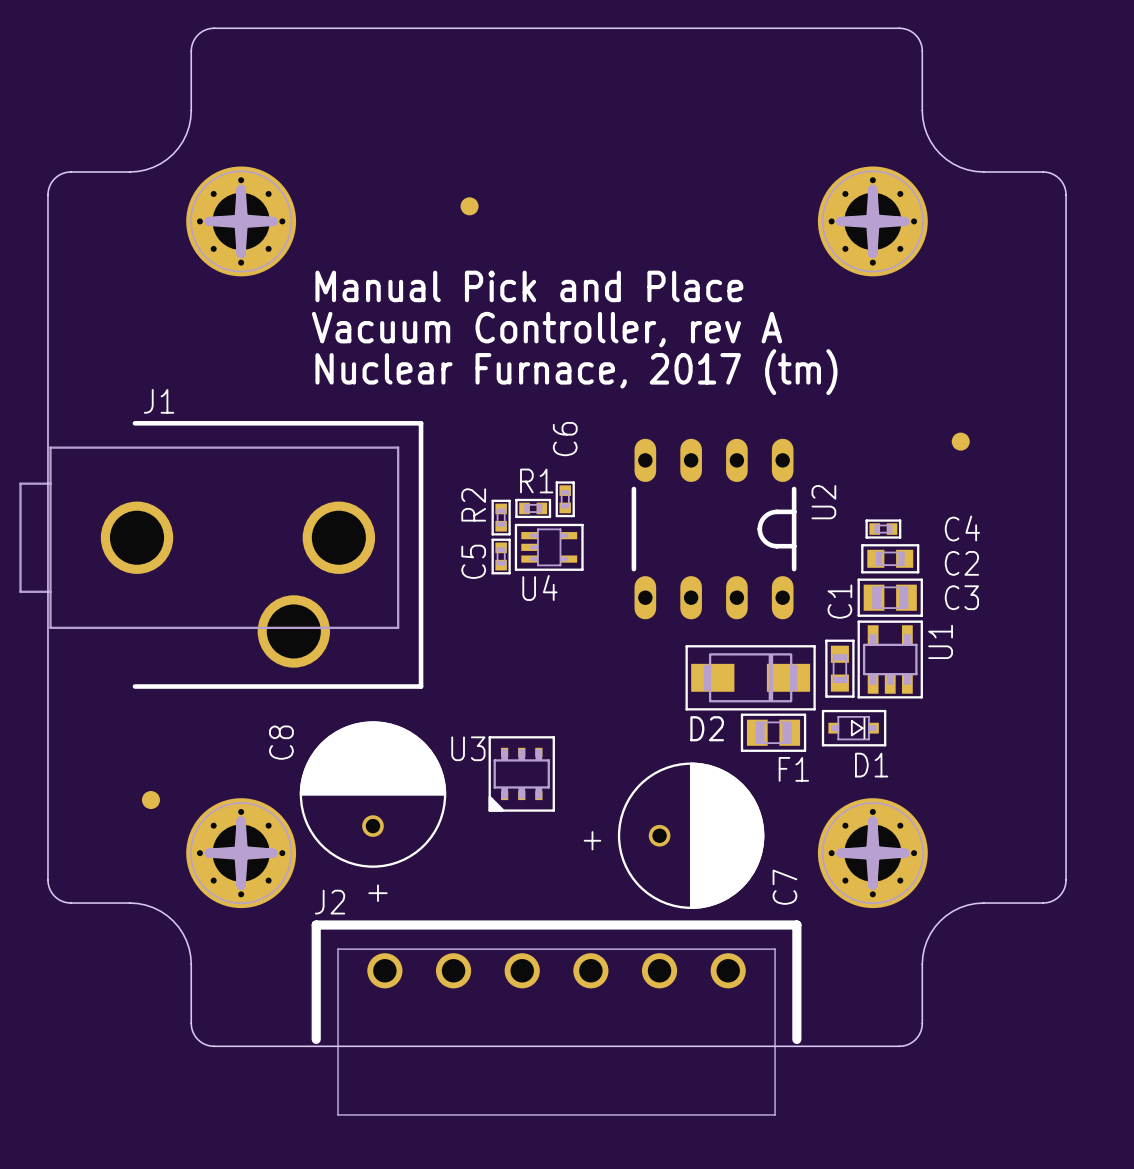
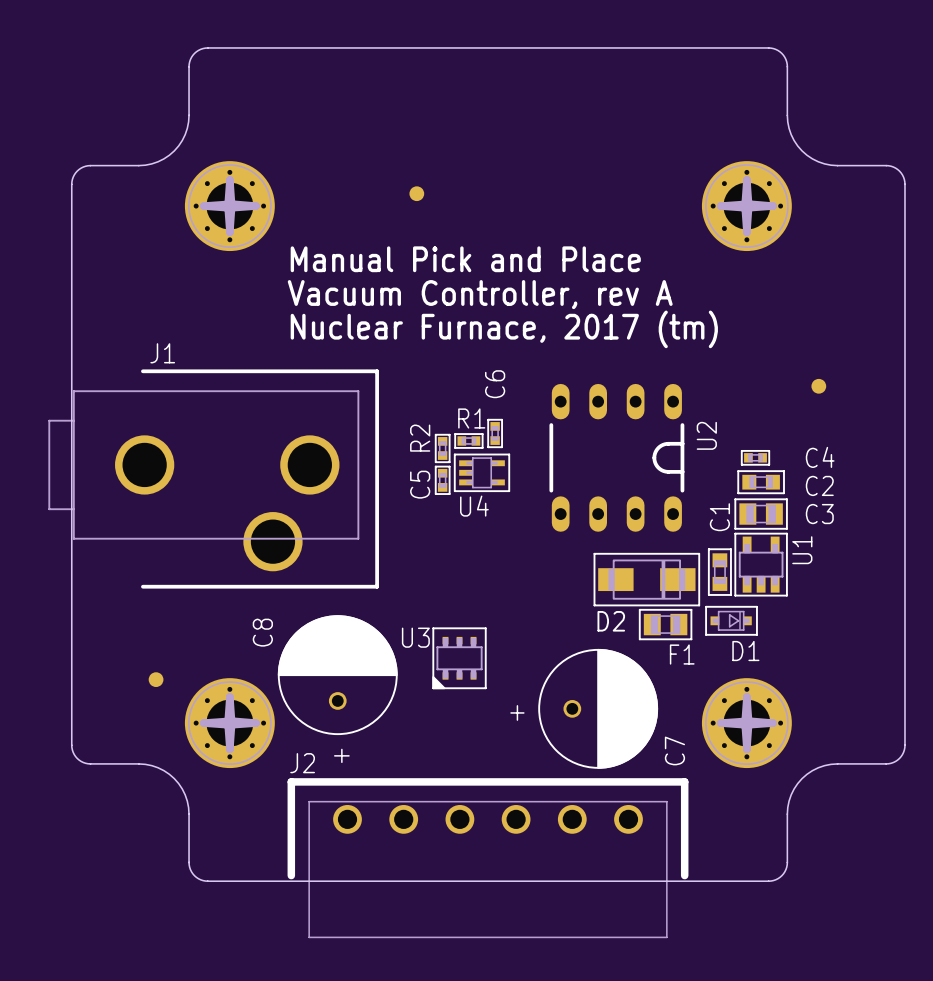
D1 footprint: [821, 709, 887, 747] -> [705, 605, 758, 636]

